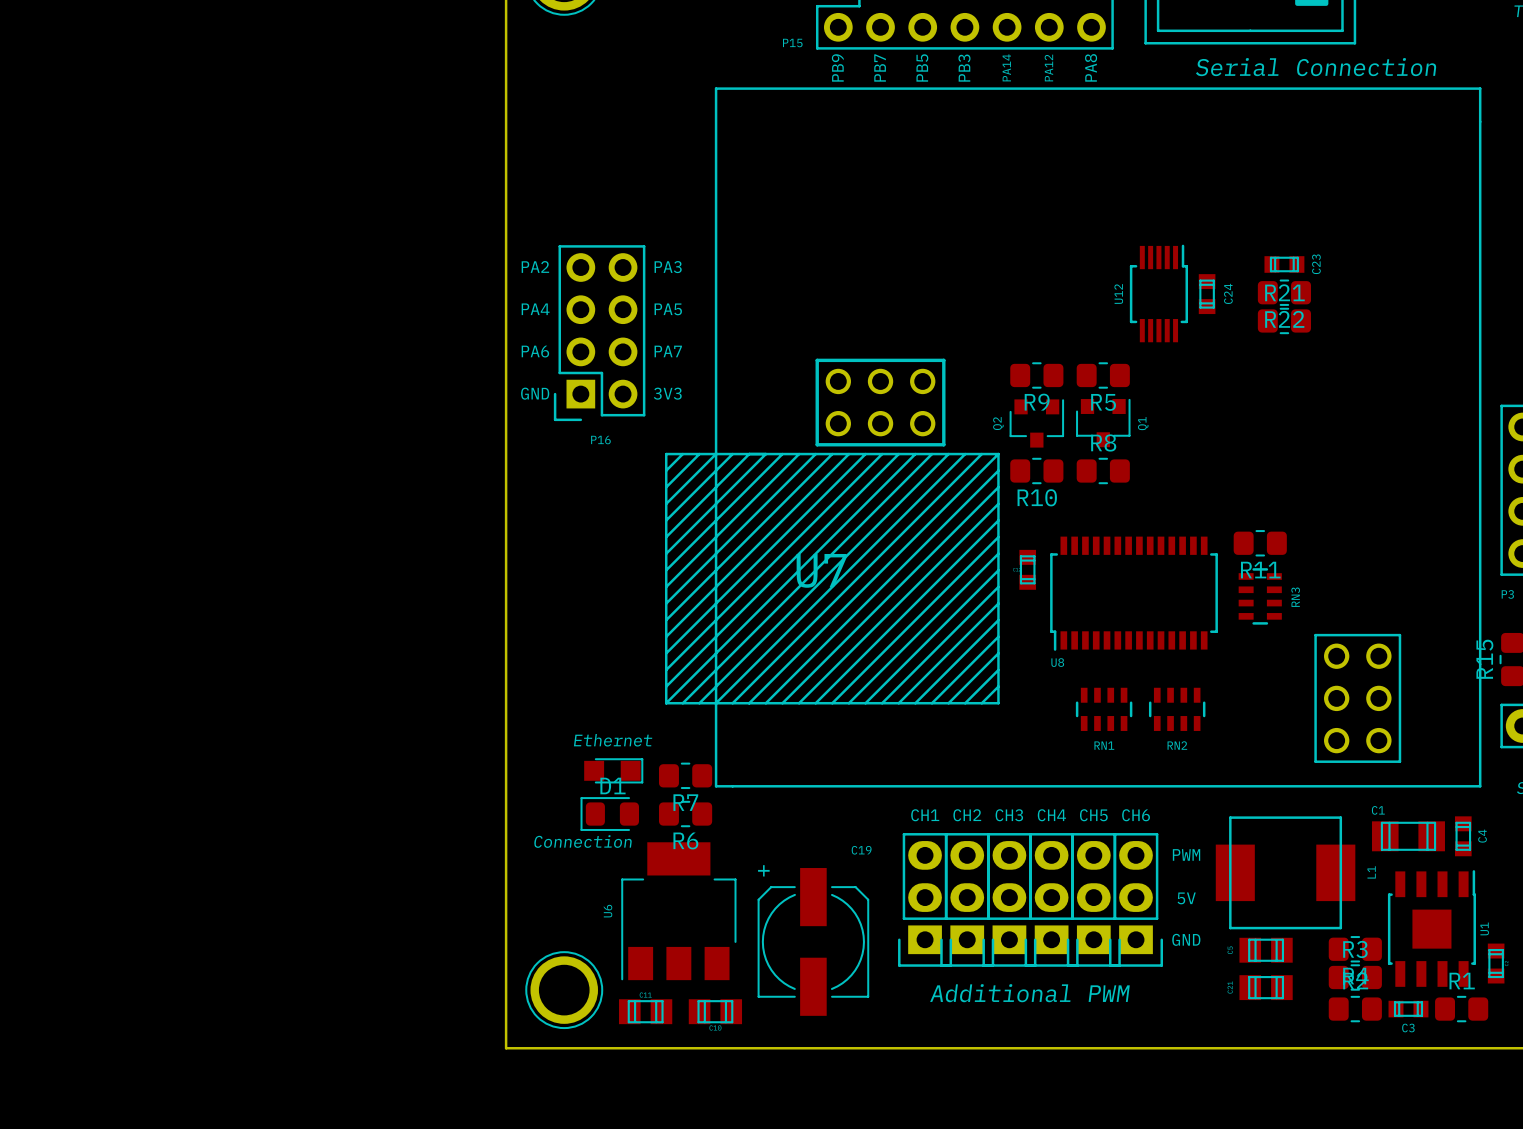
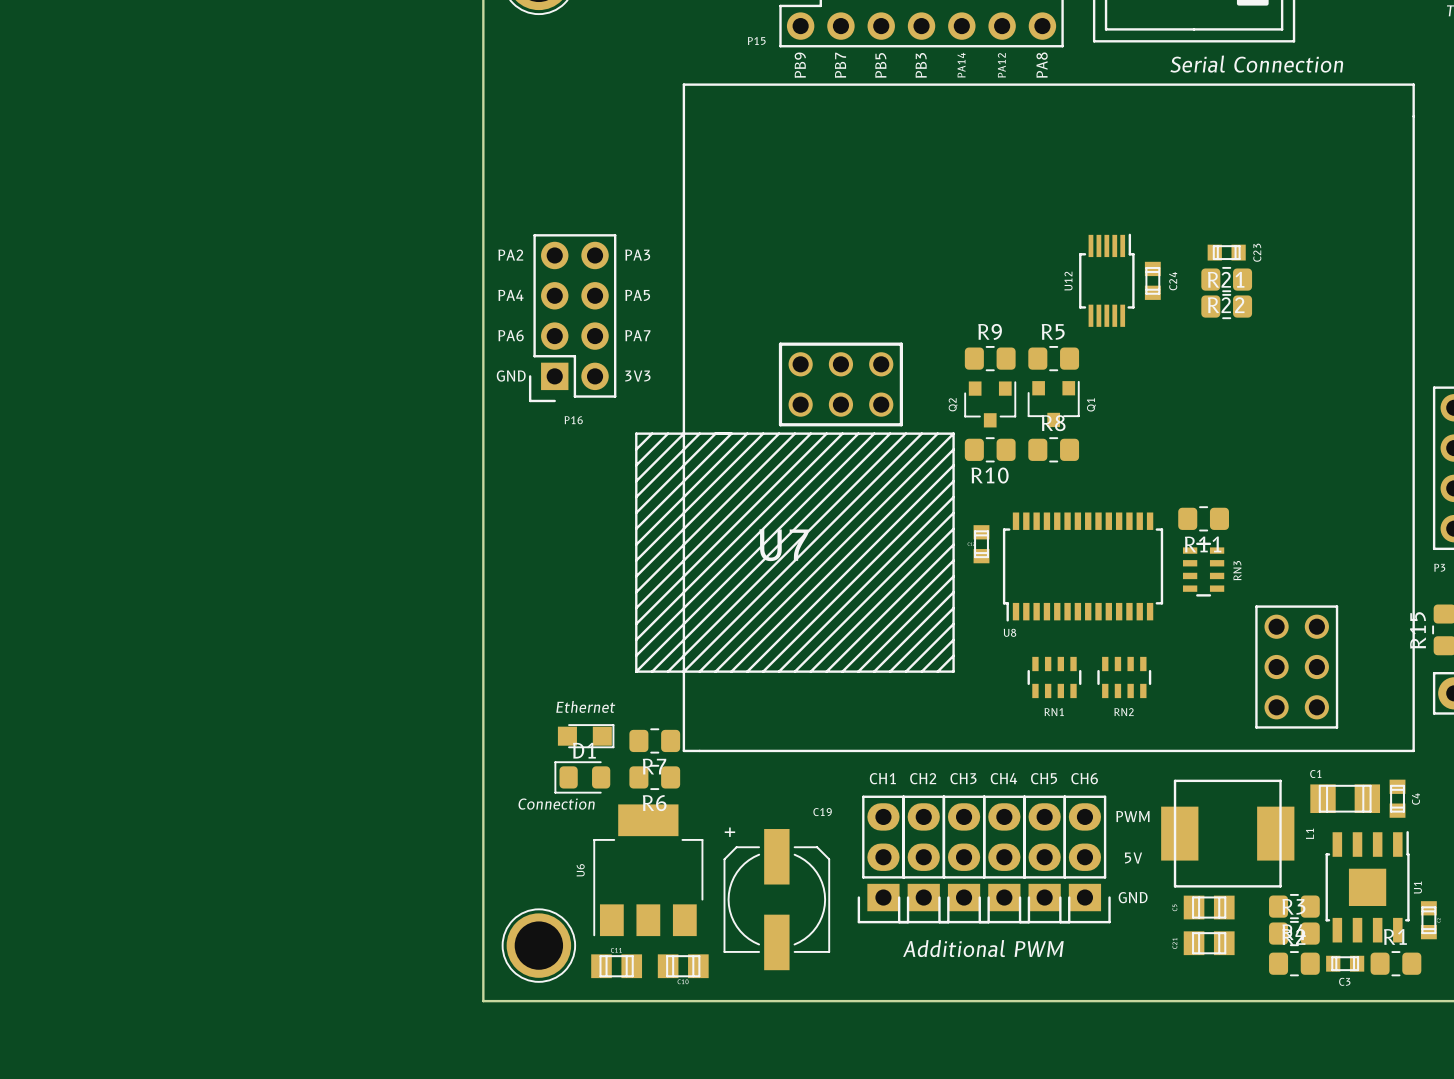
R9 name position: R9 (1037, 402) -> R9 (990, 331)
R5 name position: R5 (1103, 402) -> R5 (1053, 331)

